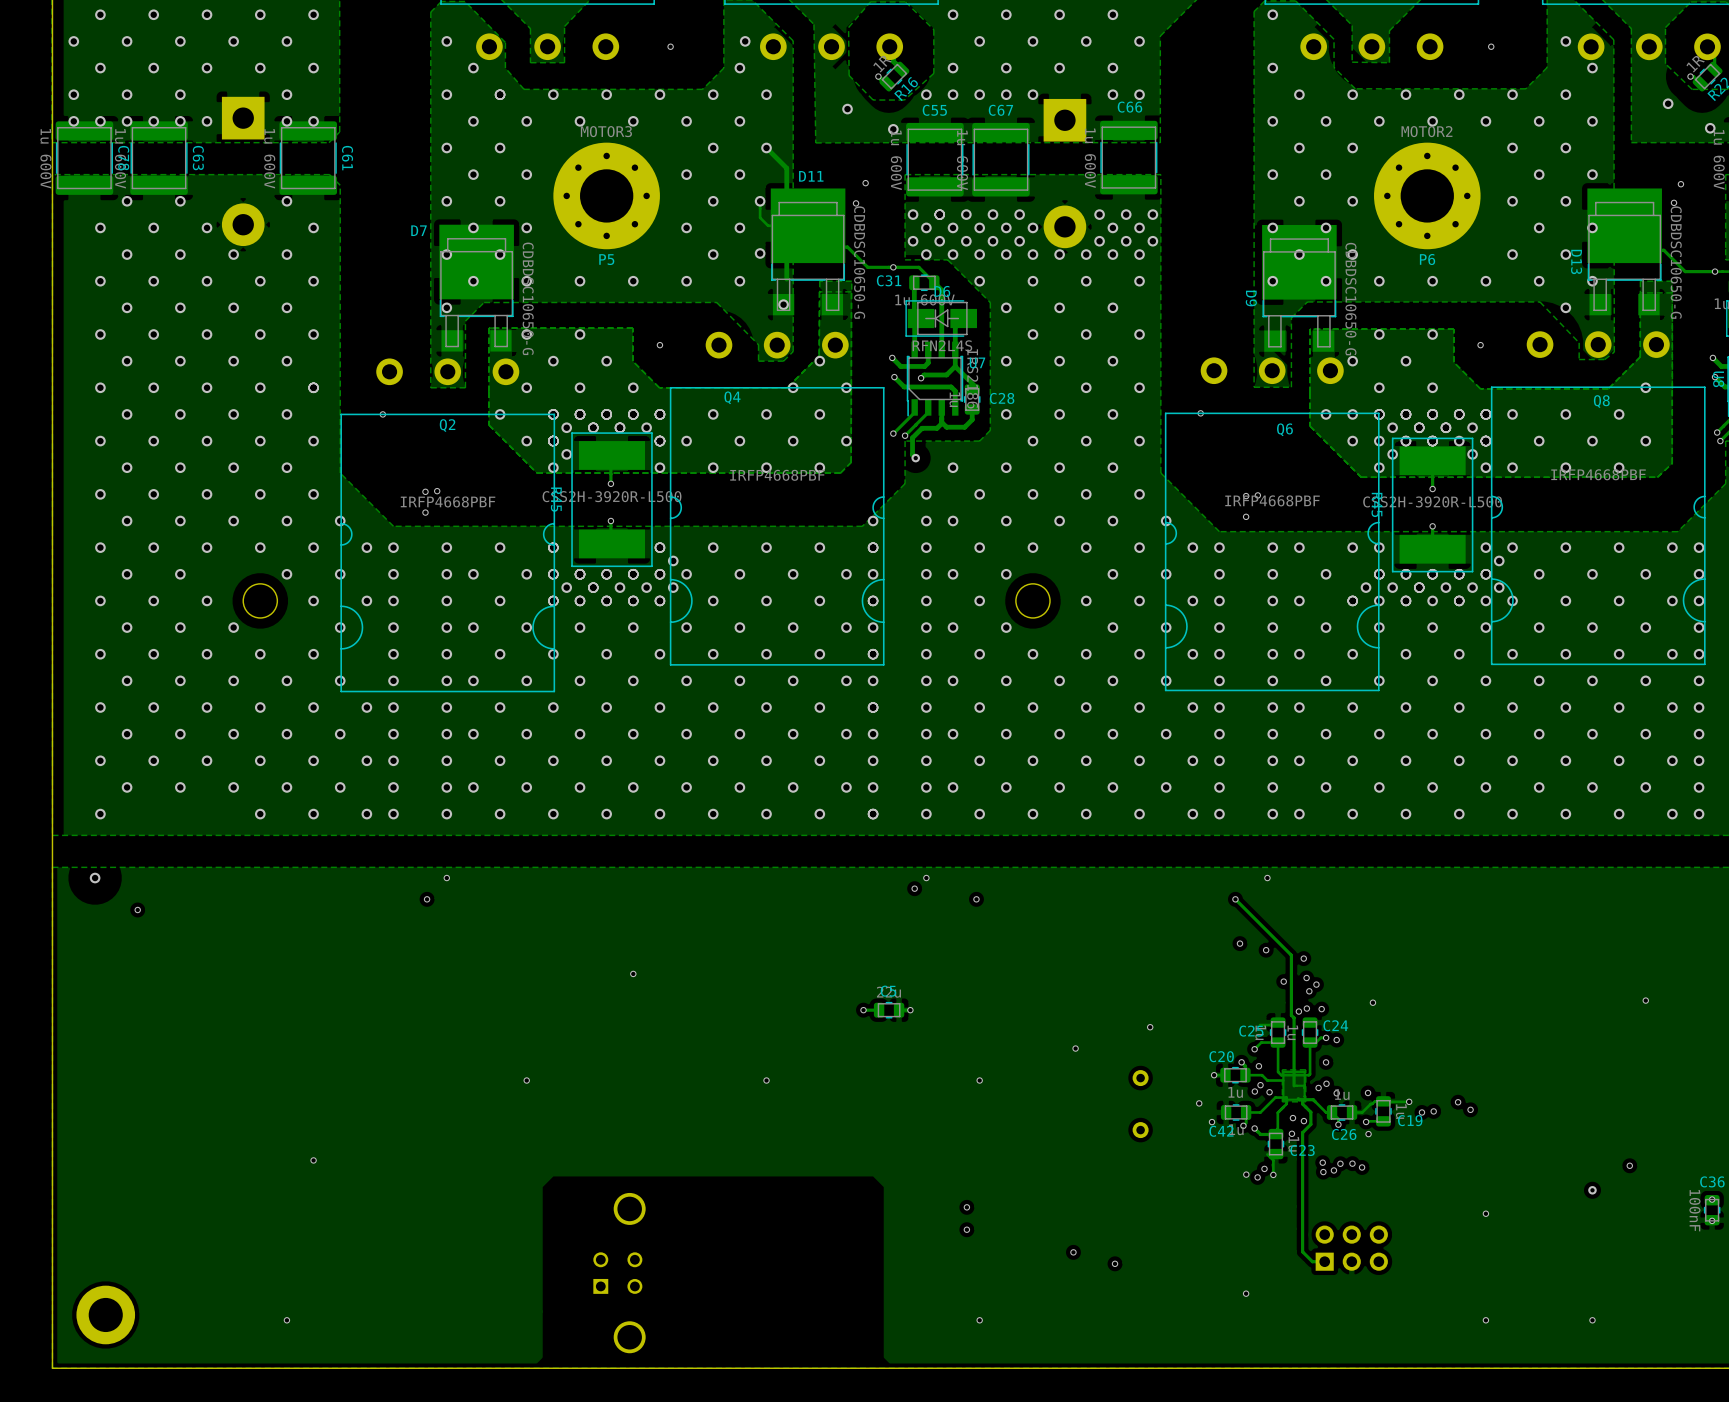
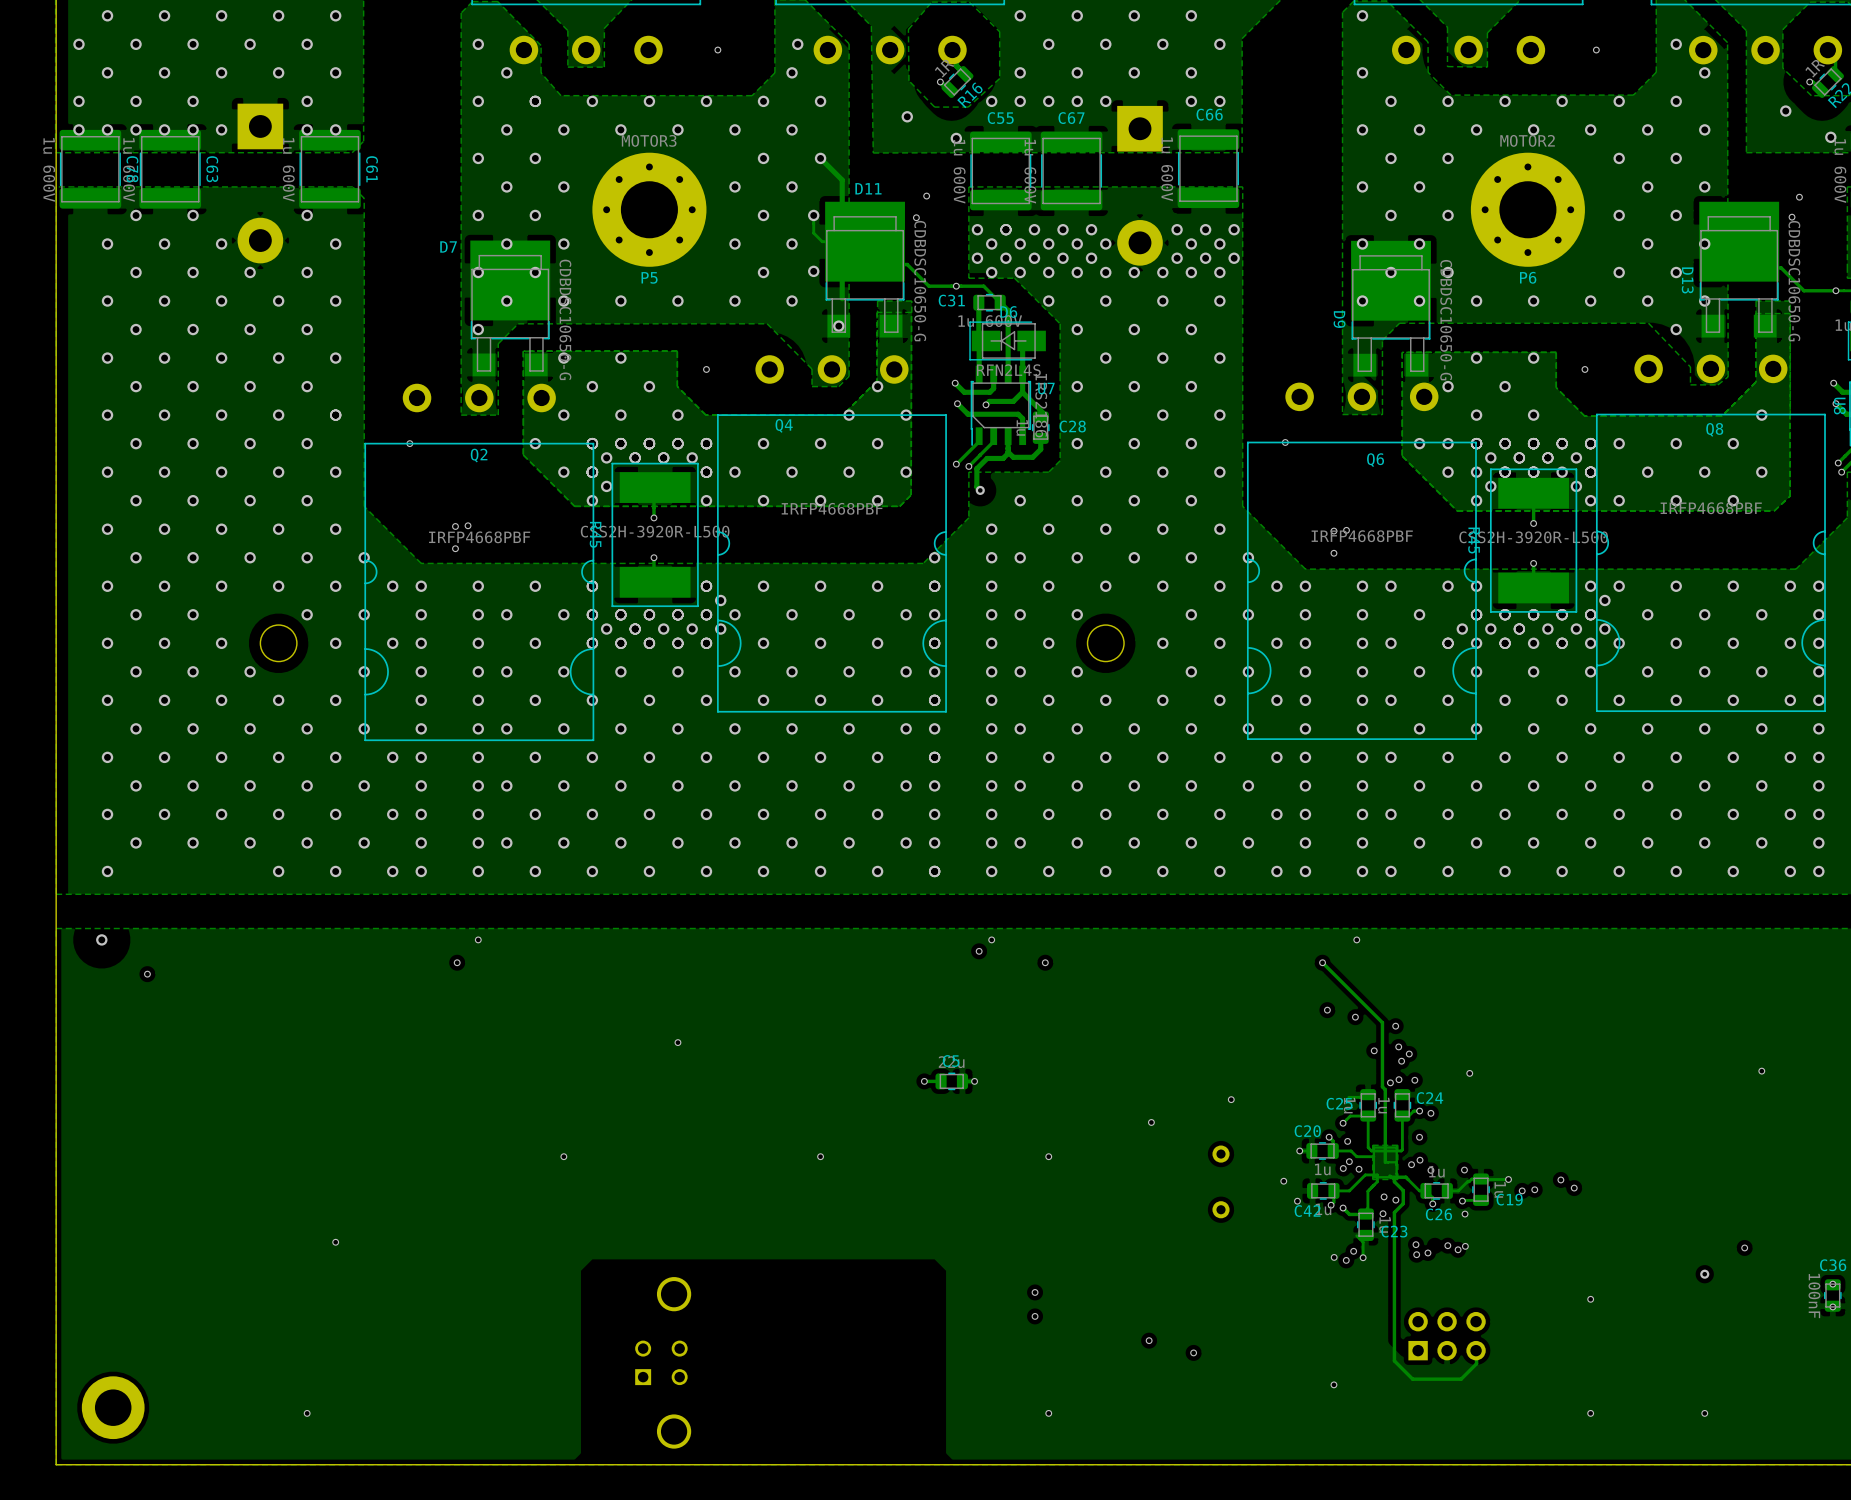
via position: (1340, 1163) -> (1465, 1246)
track: (1302, 1251) (1312, 1261) (1324, 1261) -> (1394, 1340) (1394, 1360) (1412, 1379) (1461, 1379) (1476, 1363) (1476, 1350)

